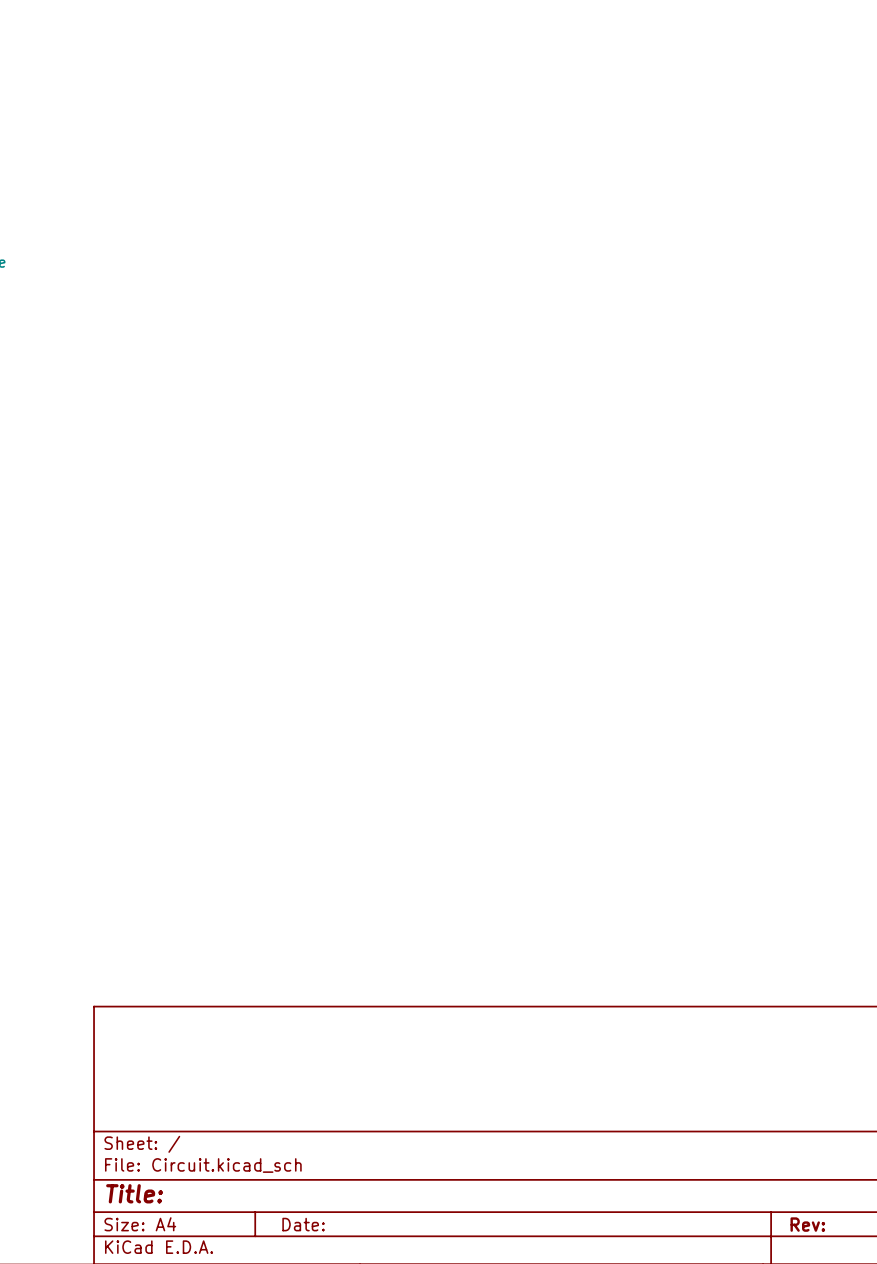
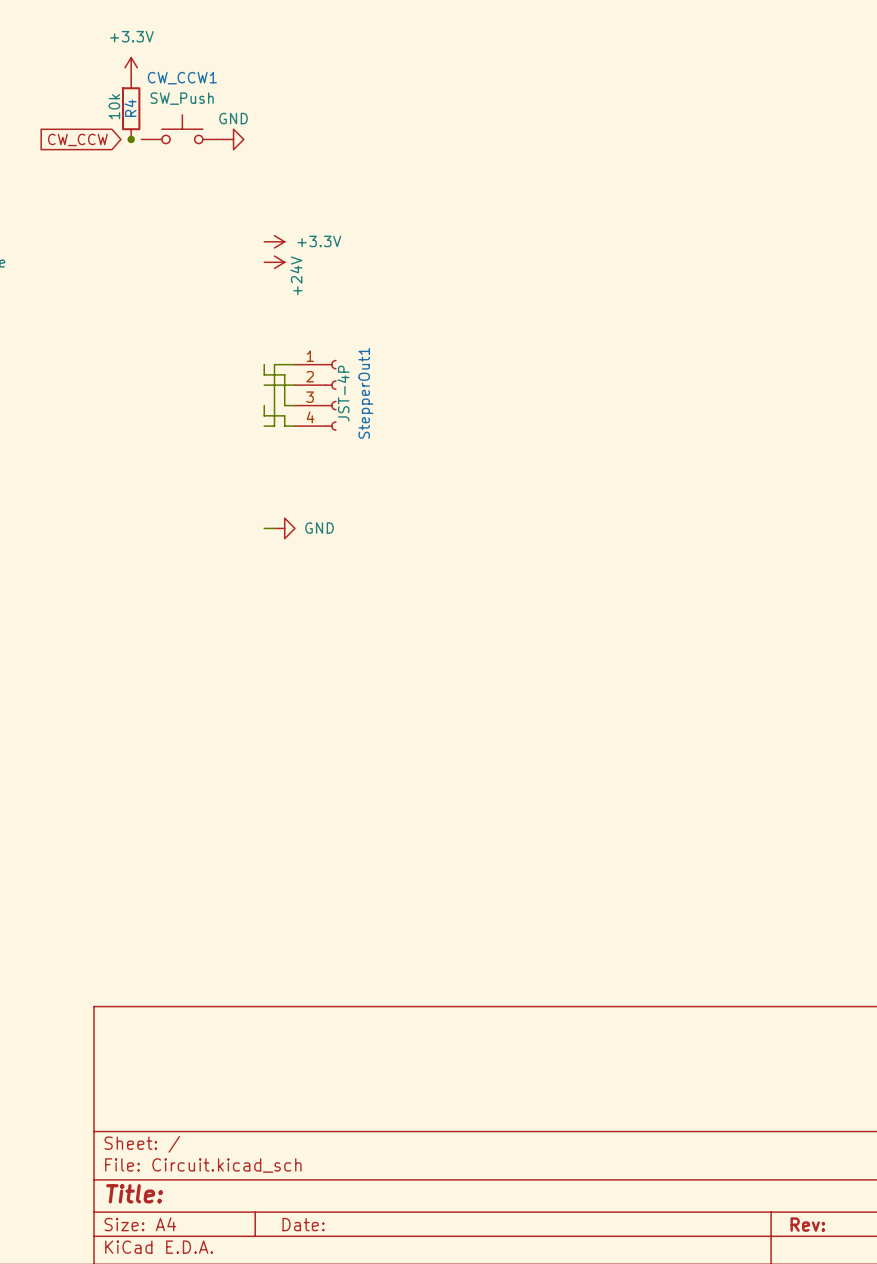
power symbol: none -> +3.3V (131, 67)
R4: none -> 10k (131, 108)
CW_CCW1: none -> SW_Push (182, 129)
global label: none -> CW_CCW (77, 139)
junction: none -> (131, 139)
power symbol: none -> GND (233, 139)
power symbol: none -> +3.3V (274, 241)
power symbol: none -> +24V (274, 262)
wire: none -> (264, 364) (264, 374) (284, 374) (284, 405) (294, 405)
wire: none -> (294, 364) (274, 364) (274, 426) (264, 426)
wire: none -> (264, 385) (294, 385)
StepperOut1: none -> JST-4P (315, 395)
wire: none -> (264, 405) (264, 415) (284, 415) (284, 426) (294, 426)
wire: none -> (264, 528) (274, 528)
power symbol: none -> GND (284, 528)

